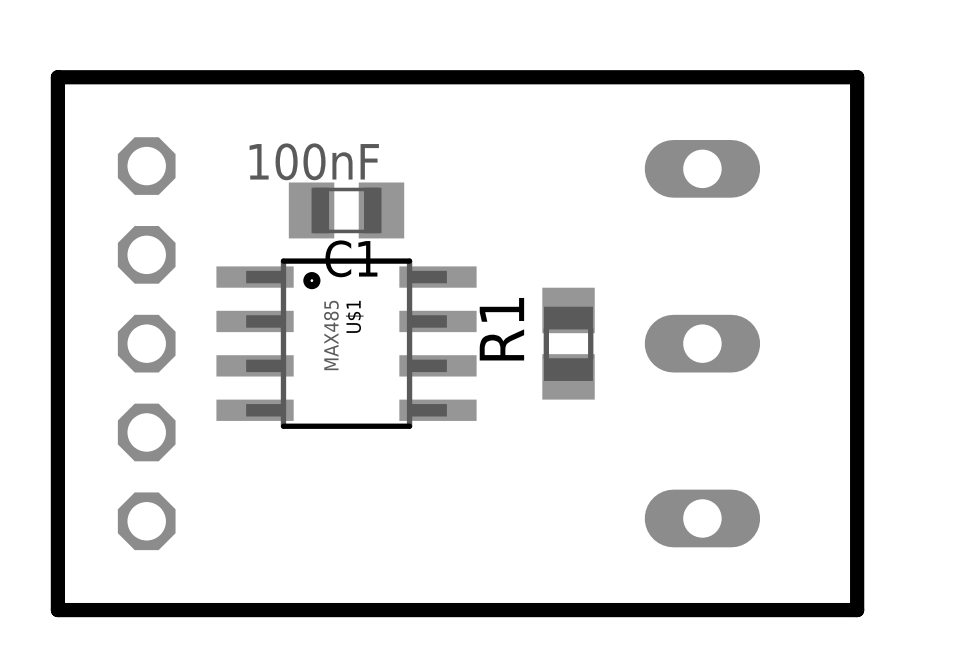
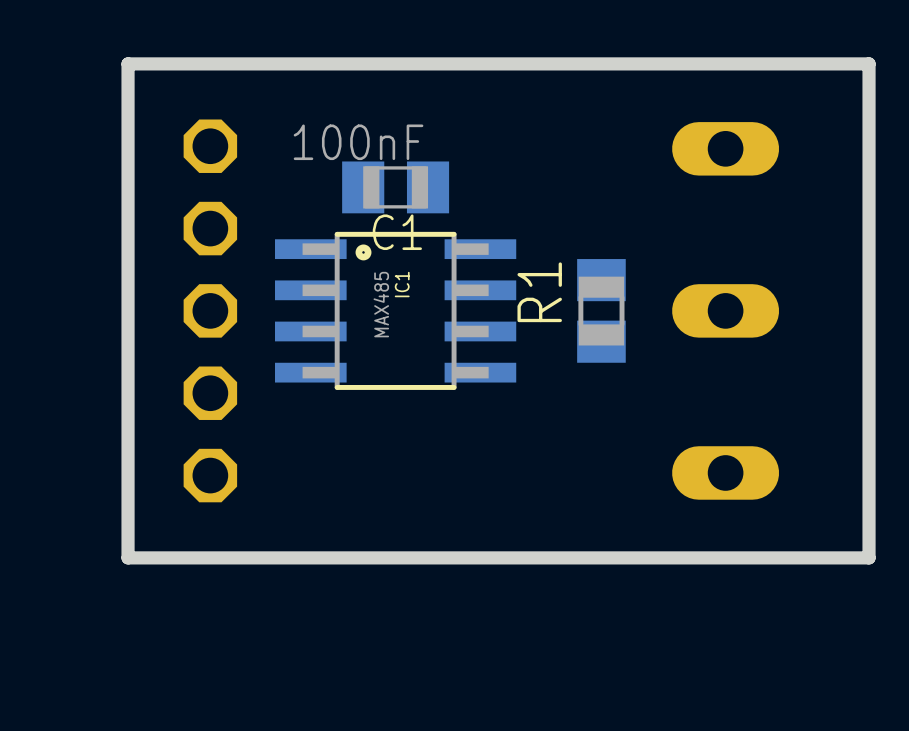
U$1 name: U$1 (354, 316) -> IC1 (402, 284)

